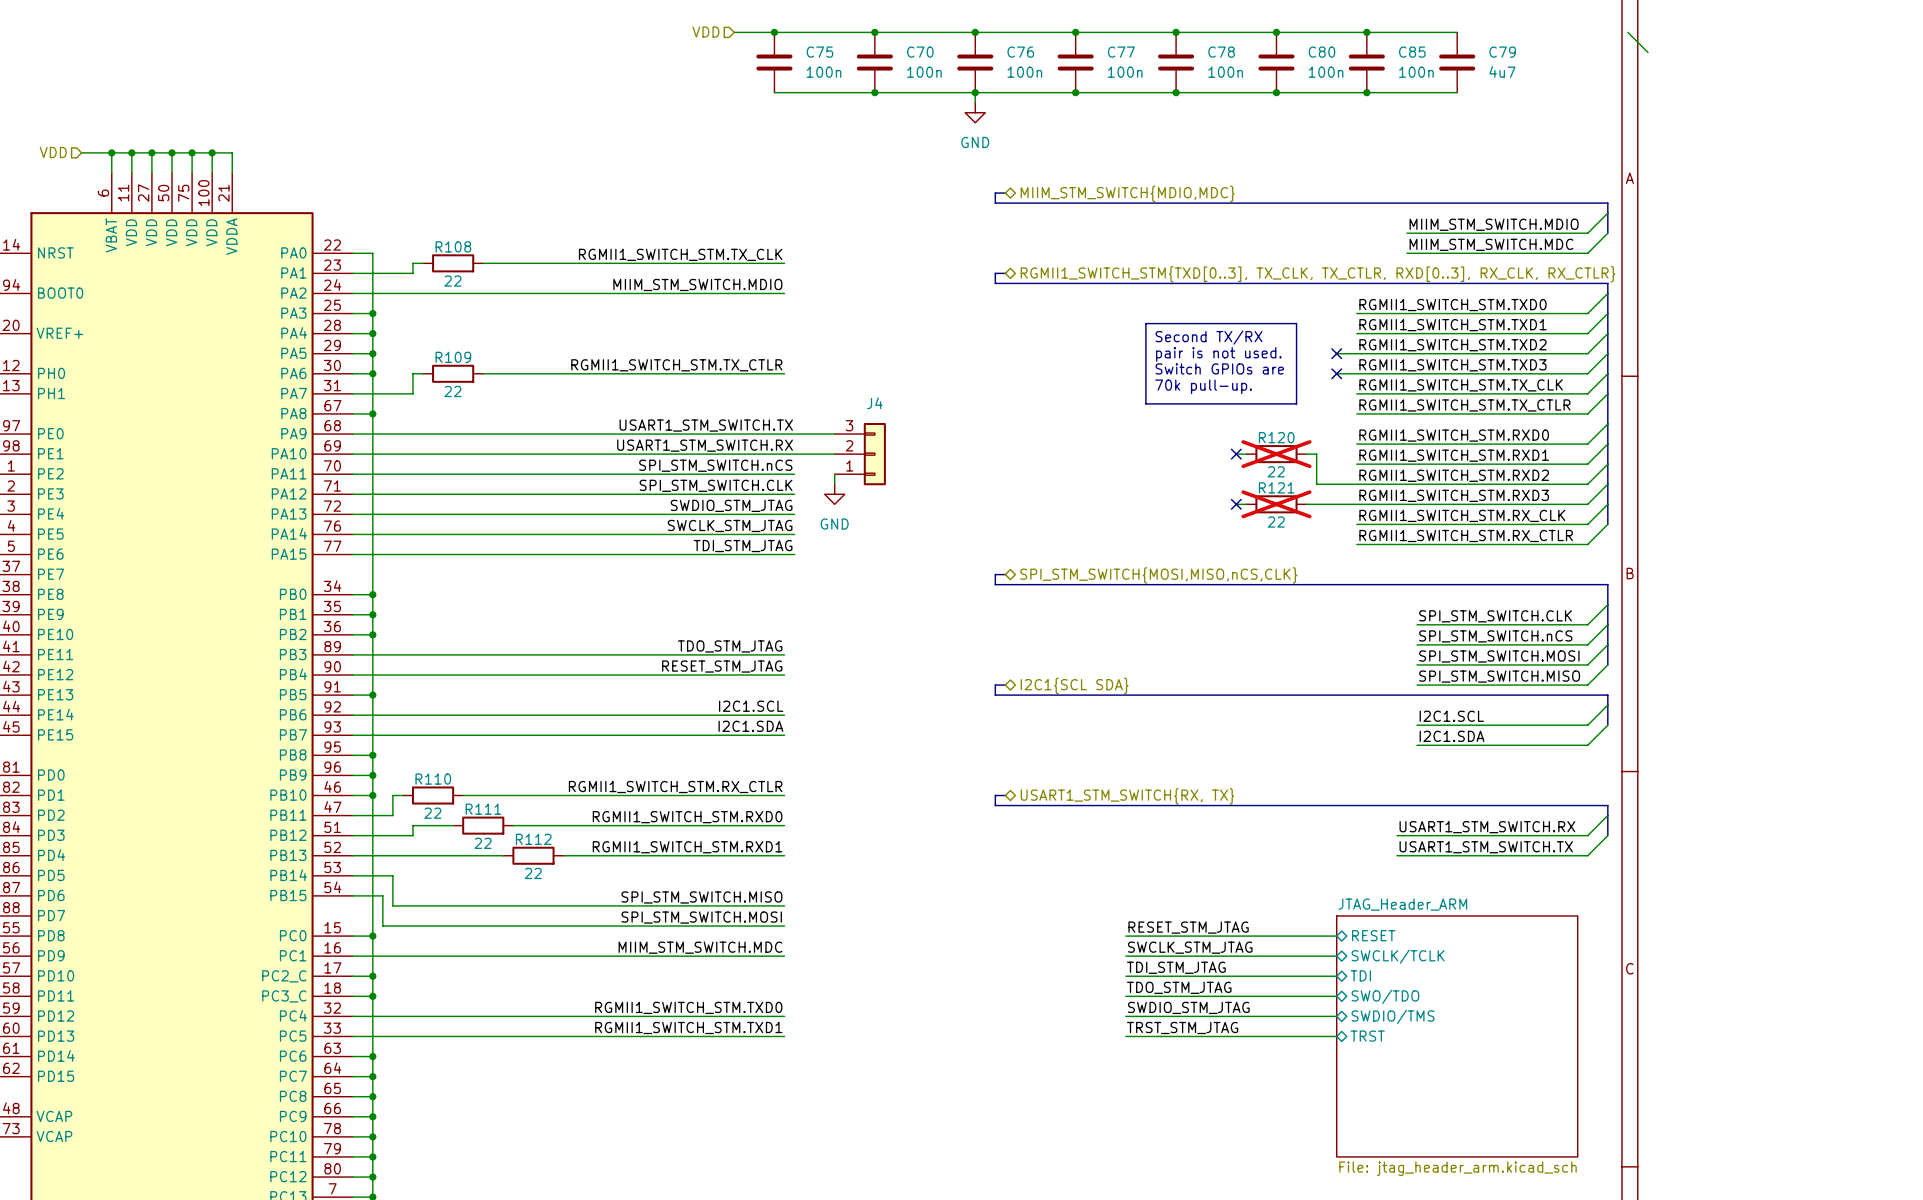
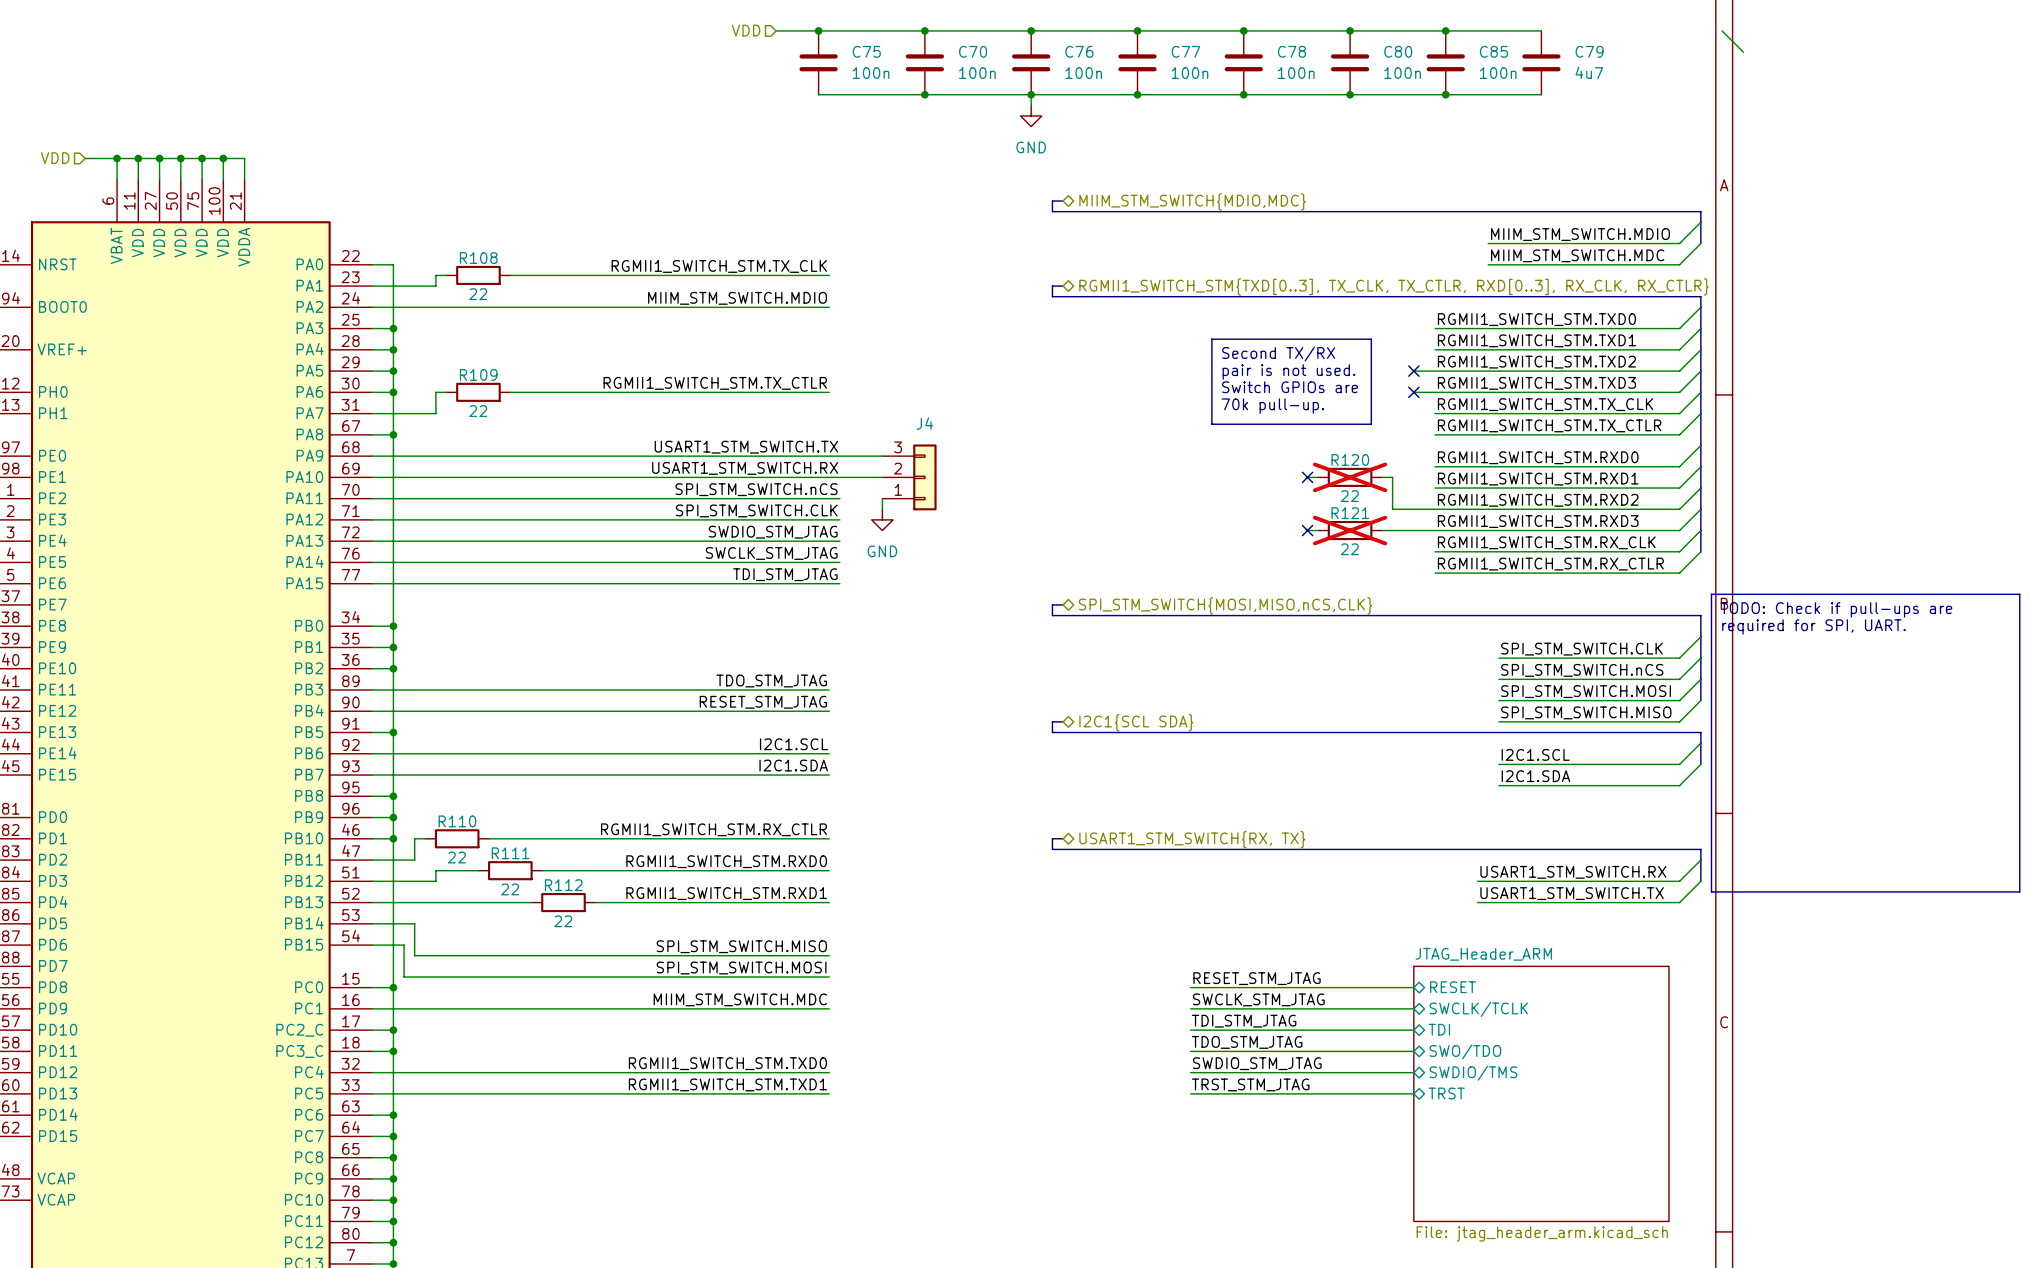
line: none -> (1711, 594) (2019, 594) (2019, 891) (1711, 891) (1711, 594)
text: none -> TODO: Check if pull-ups are (1836, 609)
text: none -> required for SPI, UART. (1813, 626)

